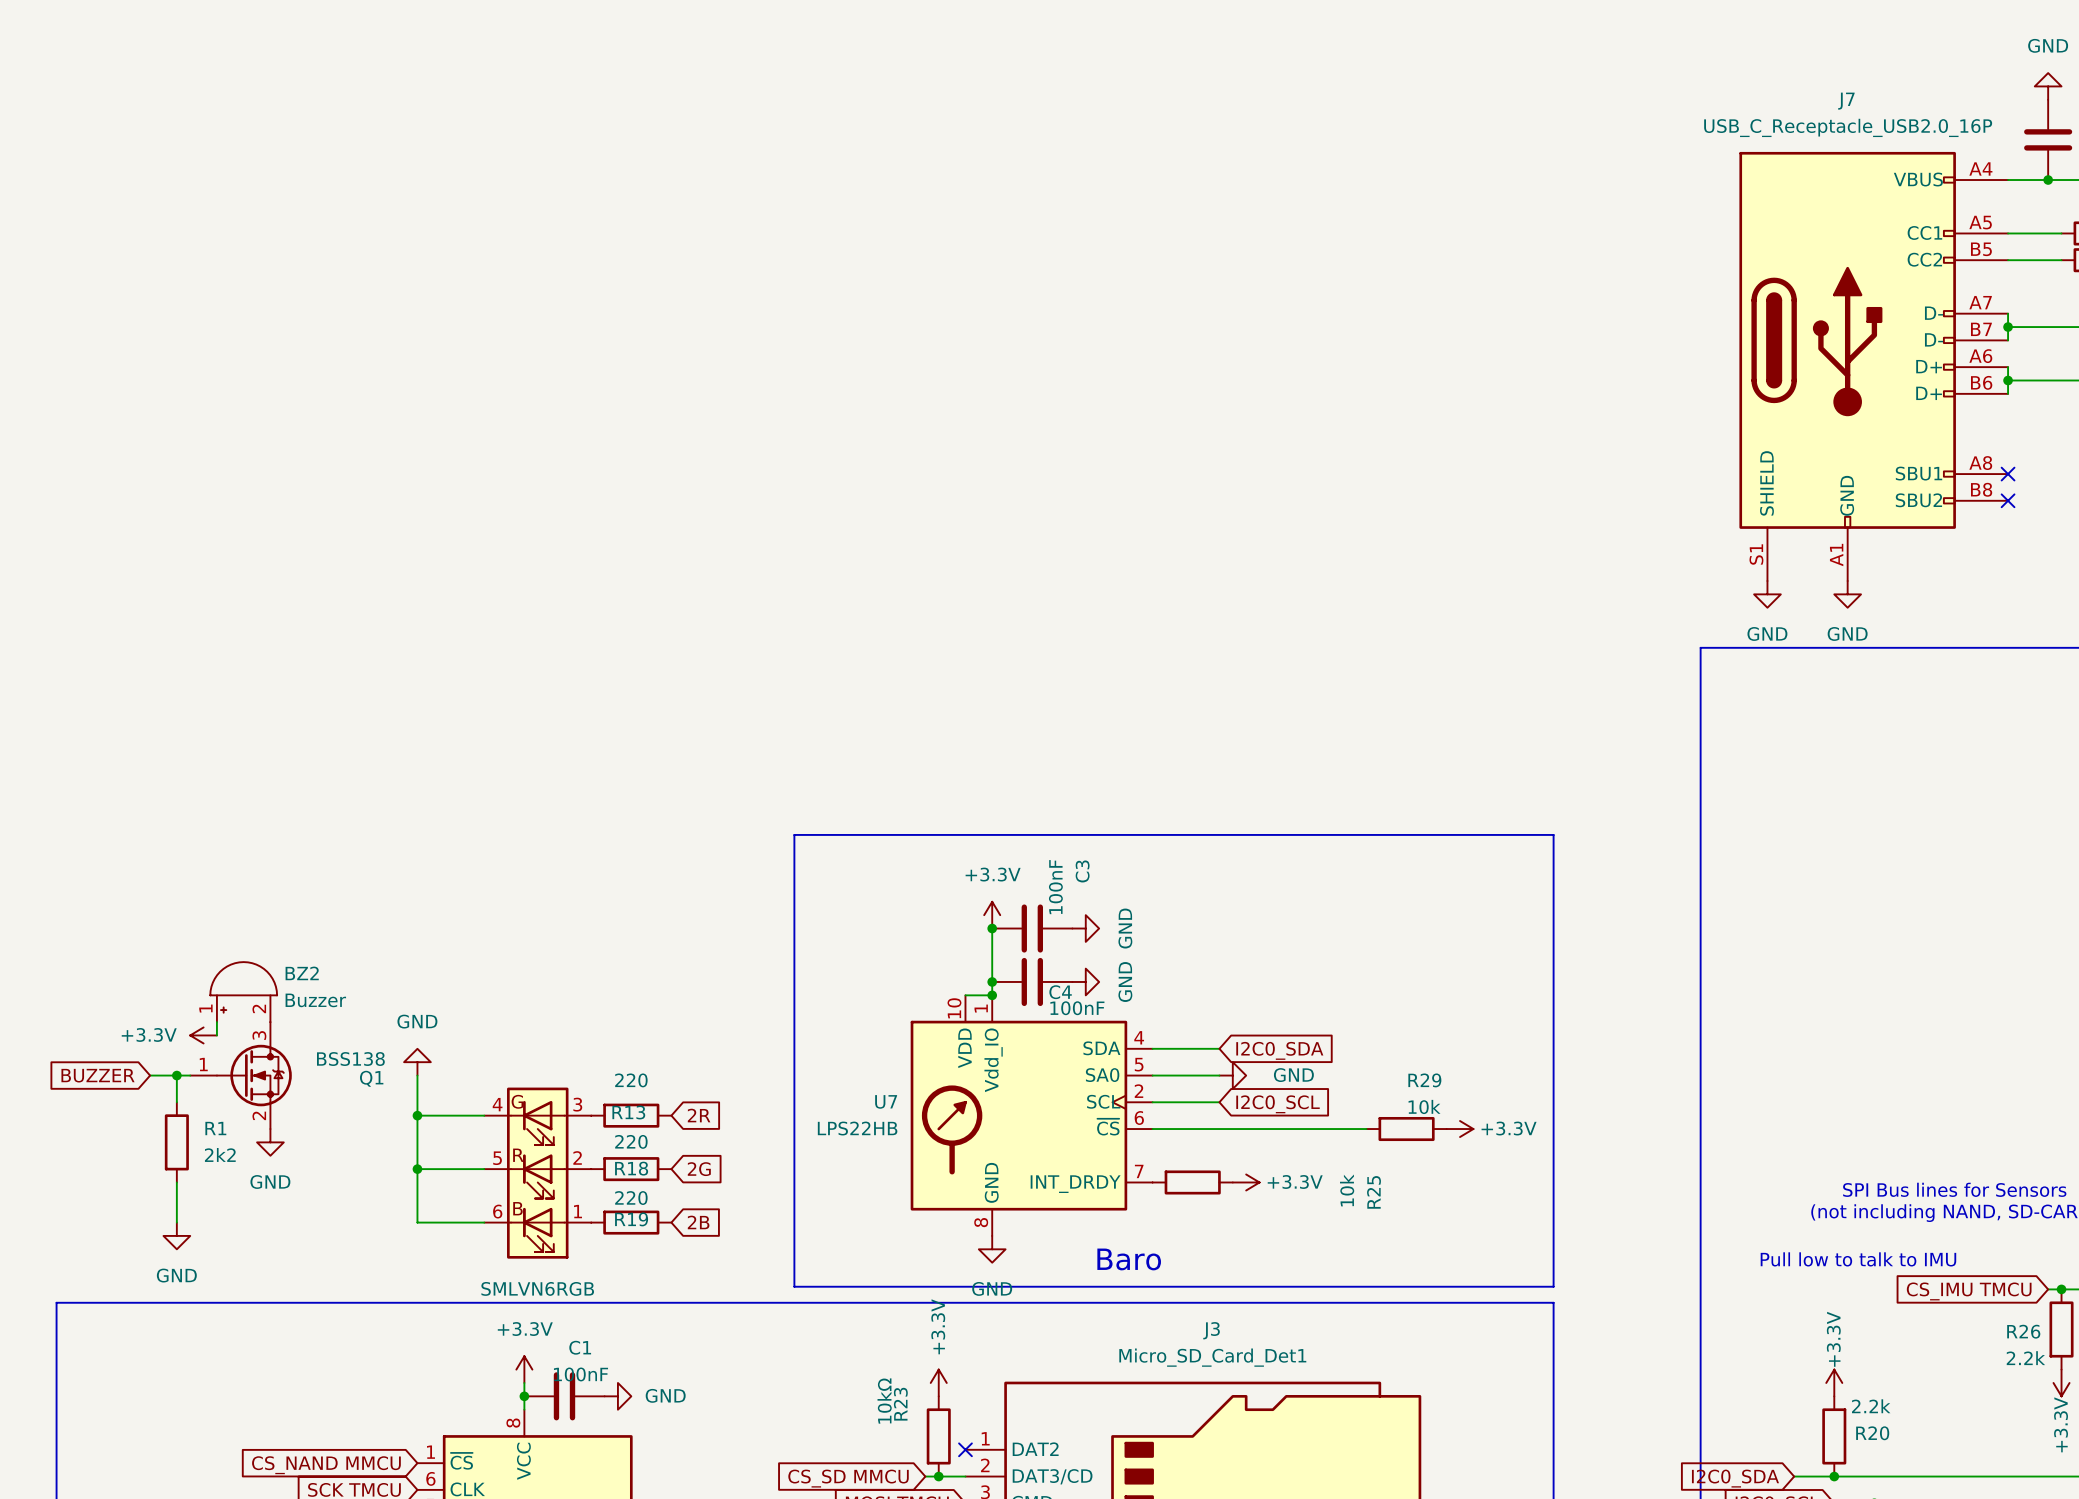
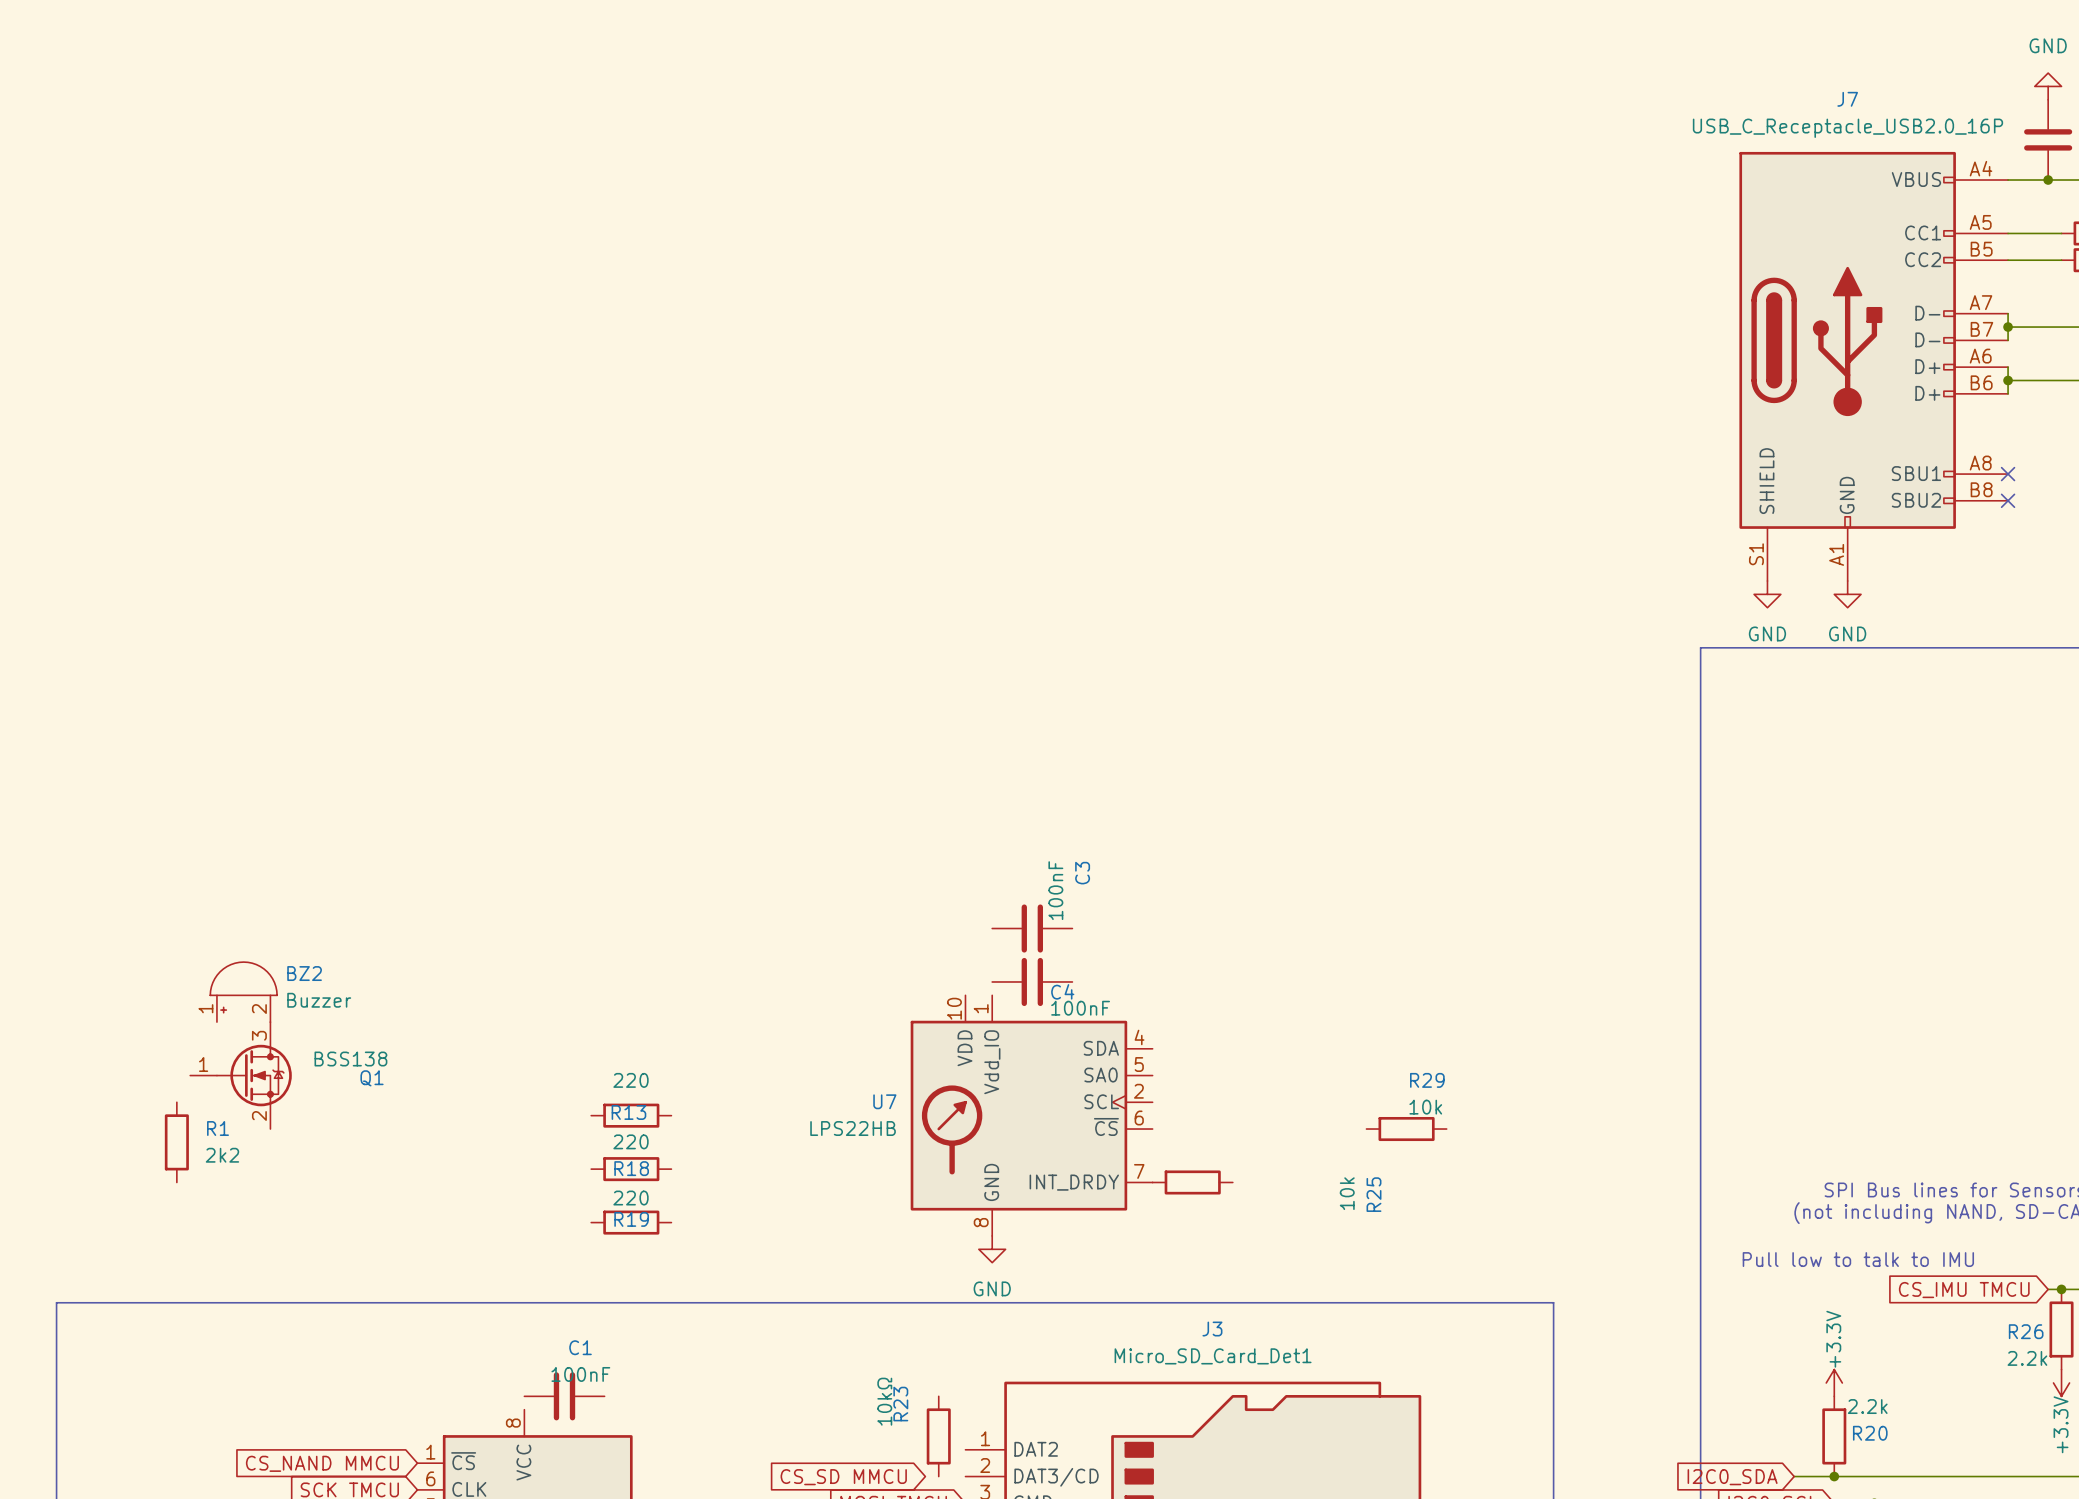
line: (794, 834) (1553, 834) (1553, 1286) (794, 1286) (794, 834) -> none
power symbol: +3.3V (992, 915) -> none
wire: (992, 928) (992, 995) (965, 995) -> none
junction: (992, 928) -> none
power symbol: GND (1085, 928) -> none
junction: (992, 981) -> none
power symbol: GND (1085, 981) -> none
junction: (992, 995) -> none
wire: (216, 1022) (216, 1035) -> none
power symbol: +3.3V (203, 1035) -> none
wire: (1152, 1048) (1219, 1048) -> none
global label: I2C0_SDA (1279, 1050) -> none
power symbol: GND (417, 1062) -> none
global label: BUZZER (98, 1075) -> none
wire: (150, 1075) (190, 1075) -> none
wire: (176, 1075) (176, 1102) -> none
junction: (176, 1075) -> none
wire: (417, 1075) (417, 1222) (484, 1222) -> none
wire: (1152, 1075) (1219, 1075) -> none
power symbol: GND (1232, 1075) -> none
wire: (1152, 1102) (1219, 1102) -> none
global label: I2C0_SCL (1278, 1104) -> none
wire: (417, 1115) (484, 1115) -> none
junction: (417, 1115) -> none
global label: 2R (699, 1115) -> none
wire: (1152, 1129) (1366, 1129) -> none
power symbol: +3.3V (1460, 1129) -> none
power symbol: GND (270, 1142) -> none
wire: (417, 1169) (484, 1169) -> none
junction: (417, 1169) -> none
global label: 2G (699, 1169) -> none
part: SMLVN6RGB (537, 1173) -> none
wire: (176, 1182) (176, 1222) -> none
power symbol: +3.3V (1246, 1182) -> none
global label: 2B (698, 1222) -> none
power symbol: GND (176, 1235) -> none
text: Baro (1129, 1259) -> none
power symbol: +3.3V (524, 1369) -> none
wire: (524, 1382) (524, 1409) -> none
power symbol: +3.3V (938, 1382) -> none
junction: (524, 1396) -> none
power symbol: GND (617, 1396) -> none
no-connect mark: (965, 1449) -> none
wire: (925, 1476) (965, 1476) -> none
junction: (938, 1476) -> none

